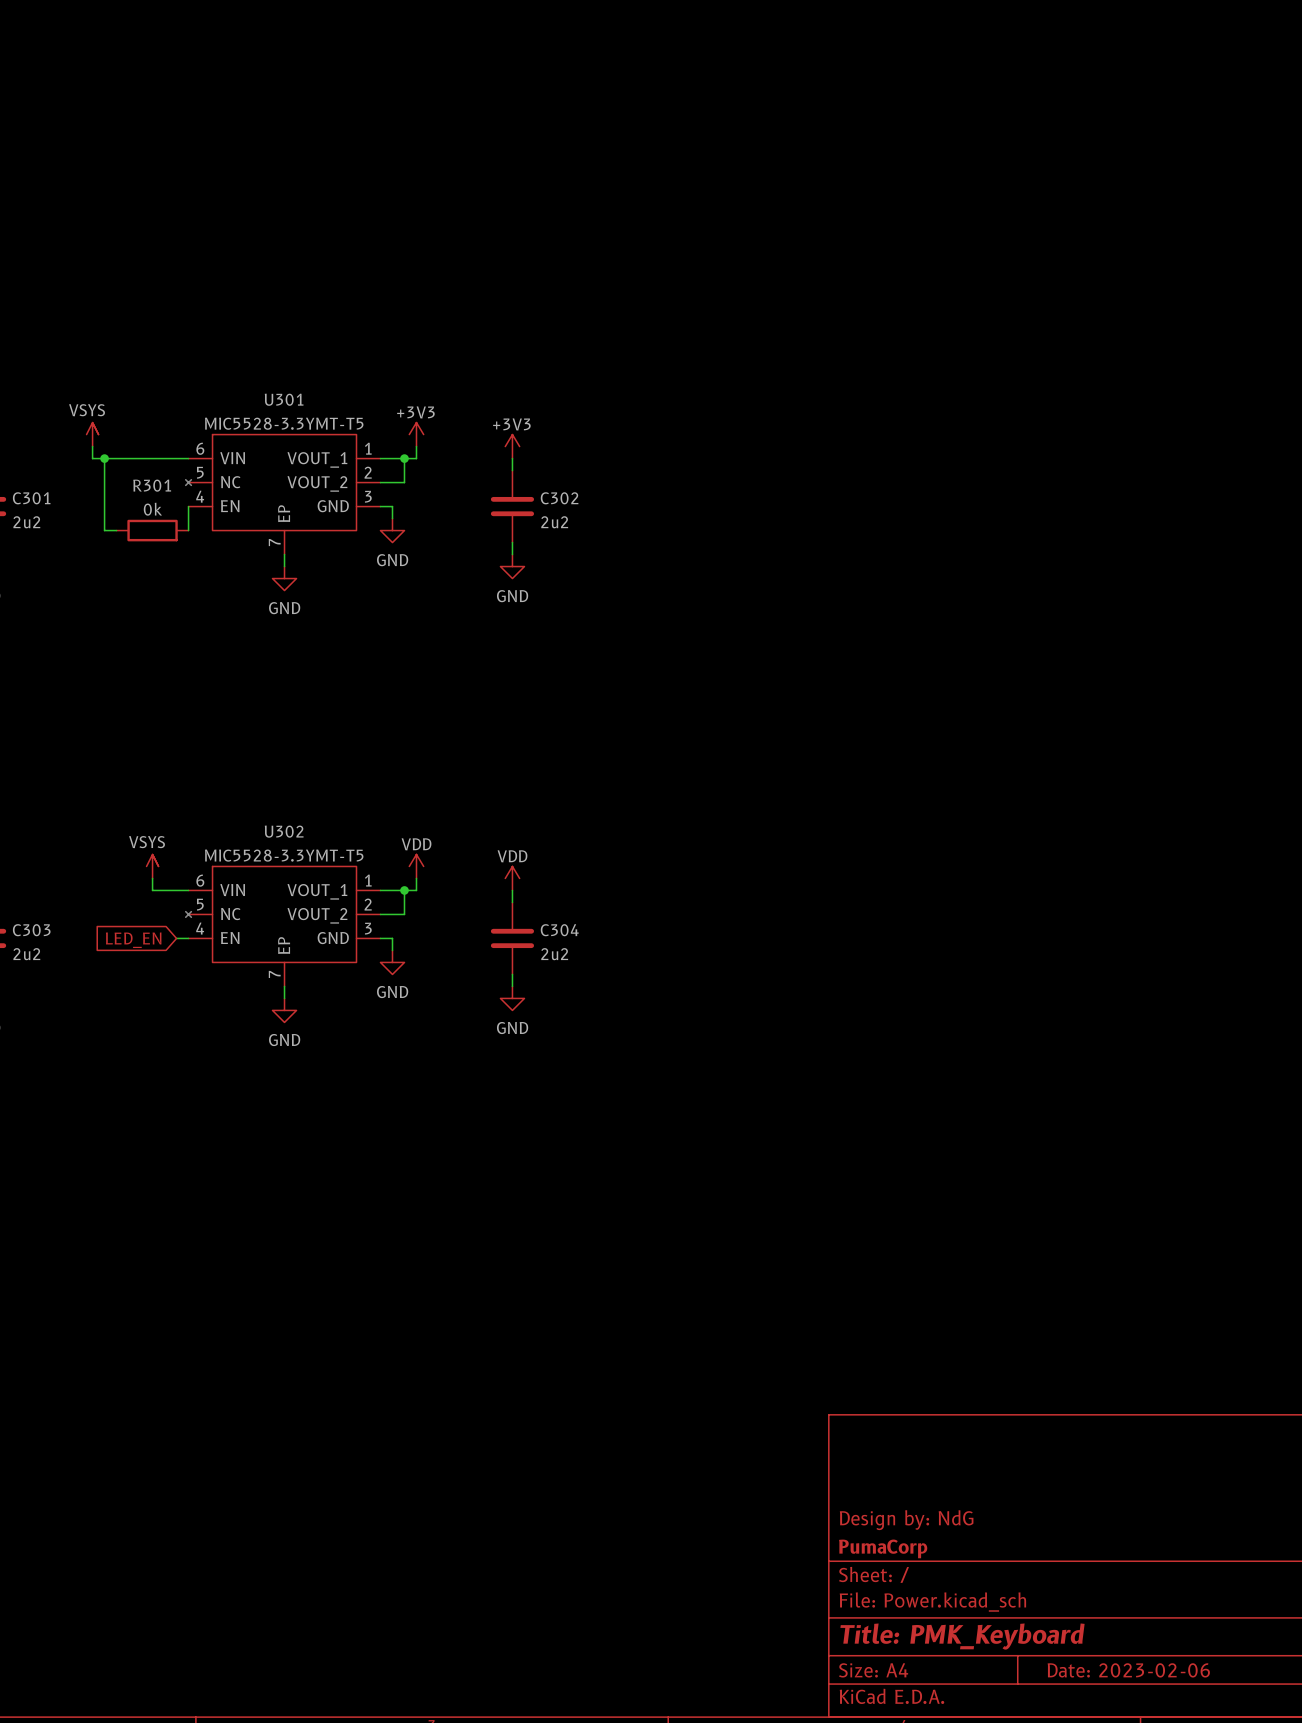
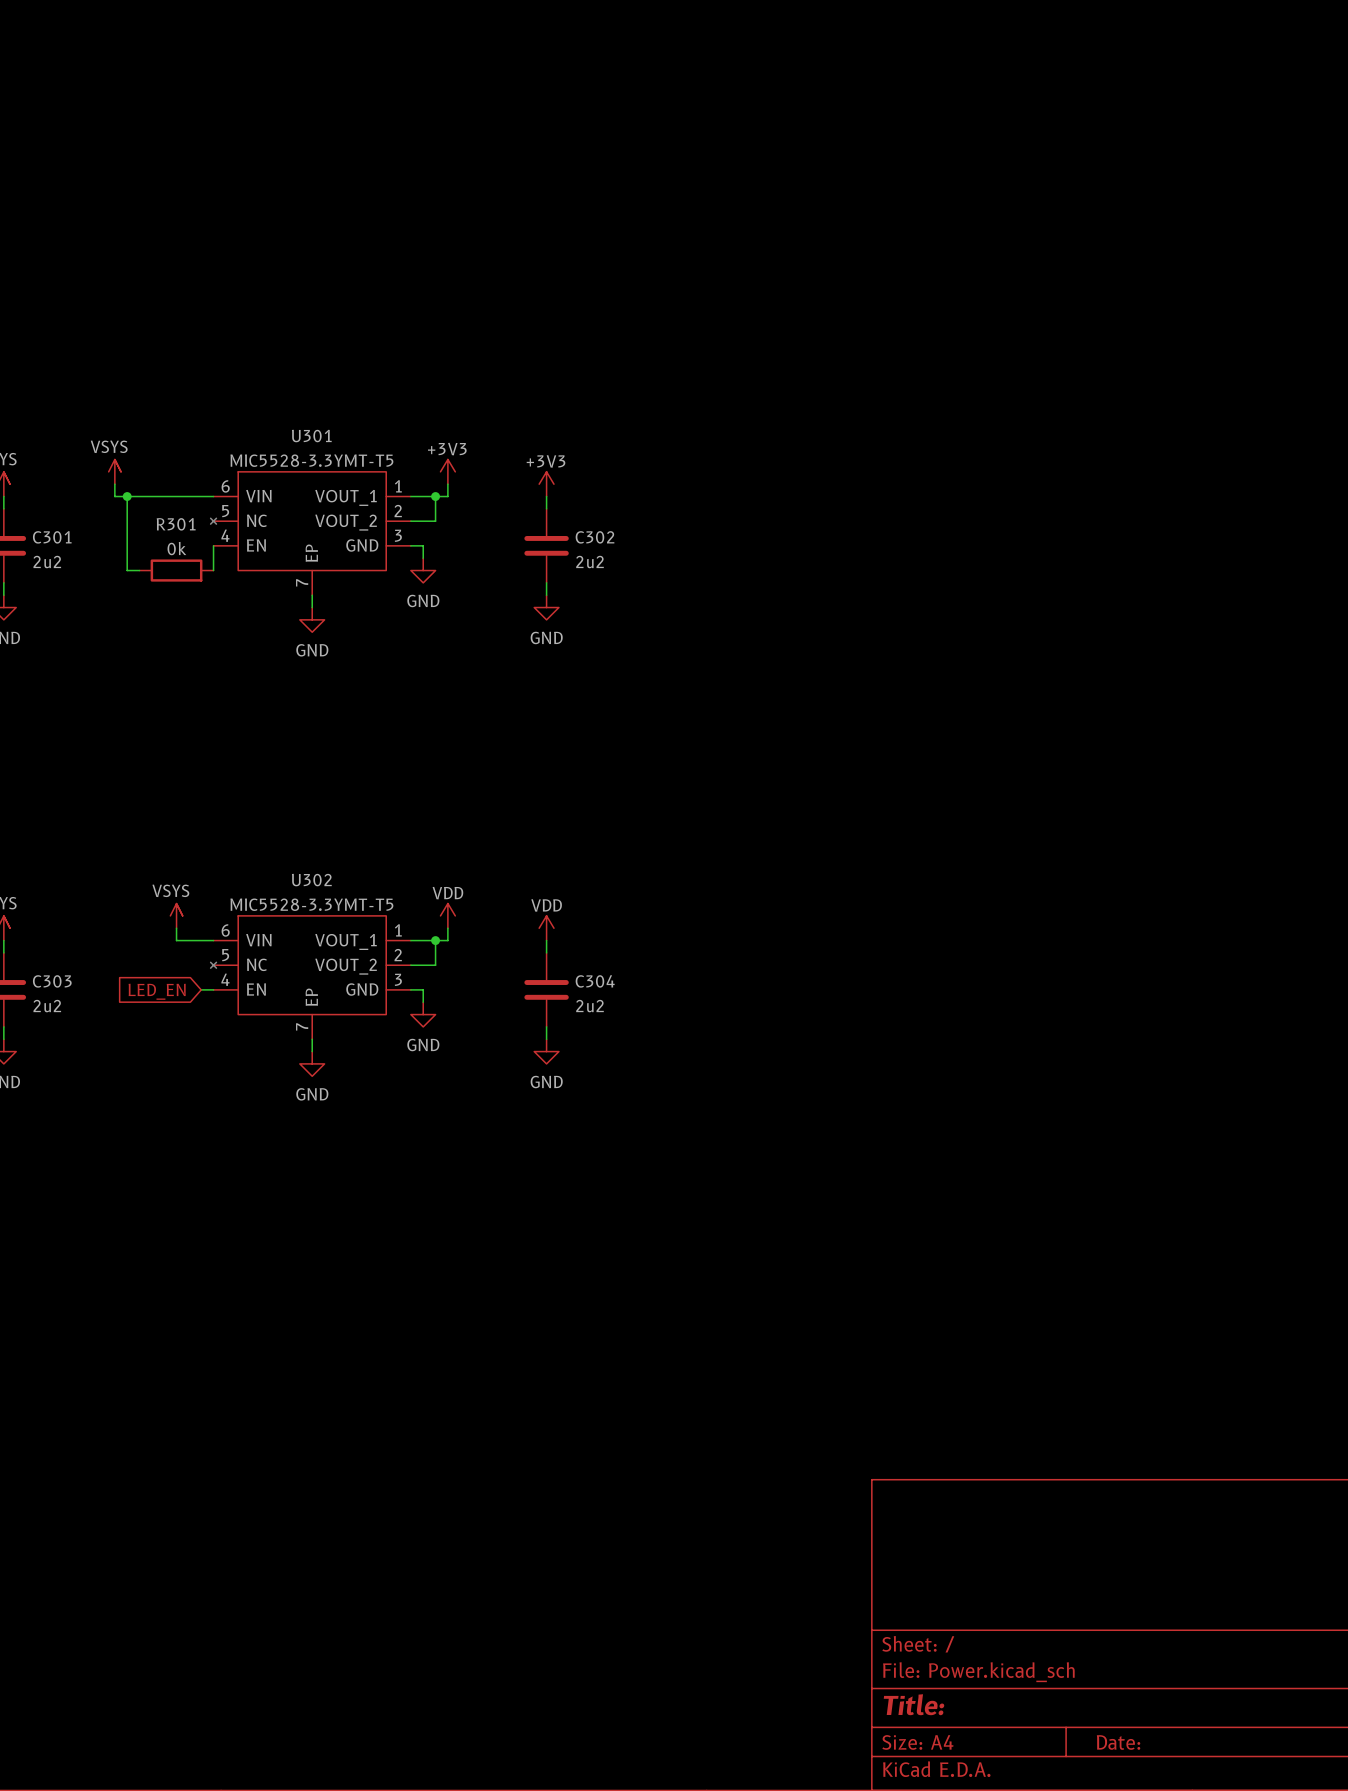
title block: Design by: NdG (906, 1520) -> none
title block: PumaCorp (883, 1548) -> none
title block: Title: PMK_Keyboard (962, 1636) -> Title: (914, 1704)
title block: Date: 2023-02-06 (1128, 1670) -> Date: (1118, 1742)

